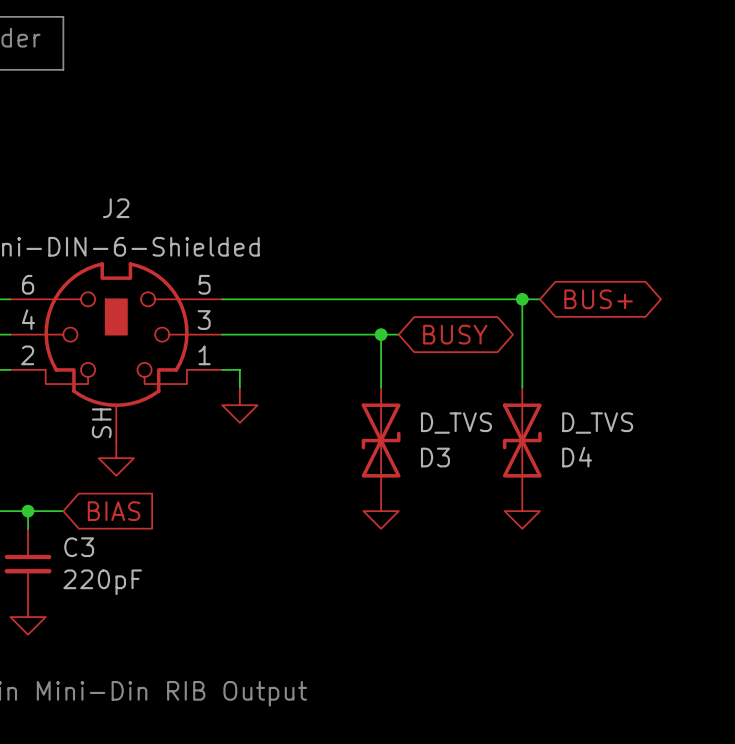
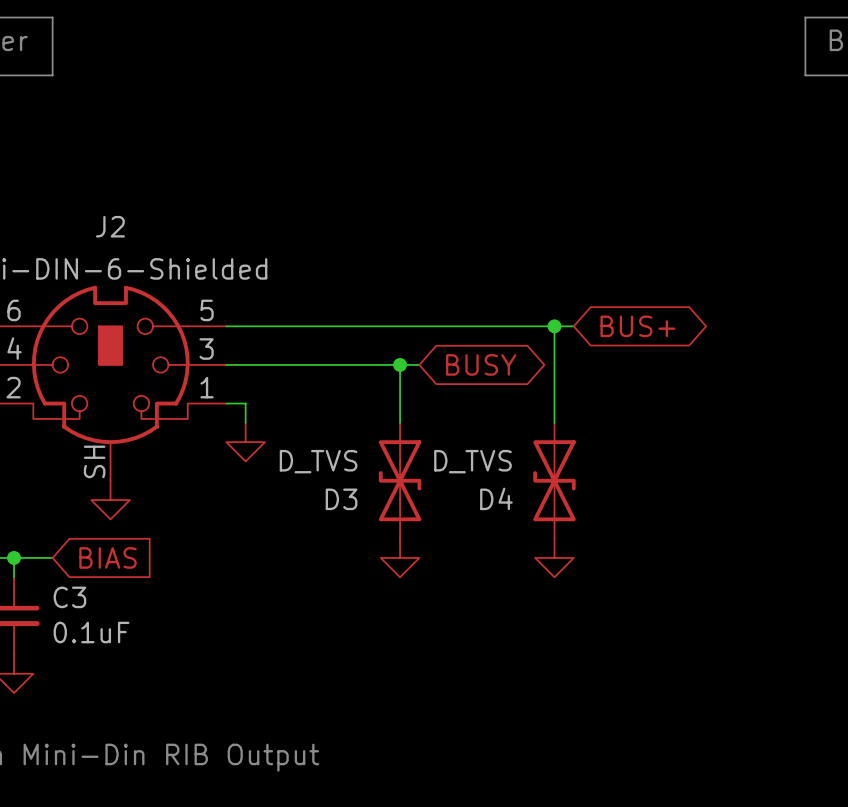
D3 flip: as is (381, 440) -> left-right (400, 480)
D4 flip: as is (522, 440) -> left-right (554, 480)
C3 value: 220pF (102, 582) -> 0.1uF (91, 632)

